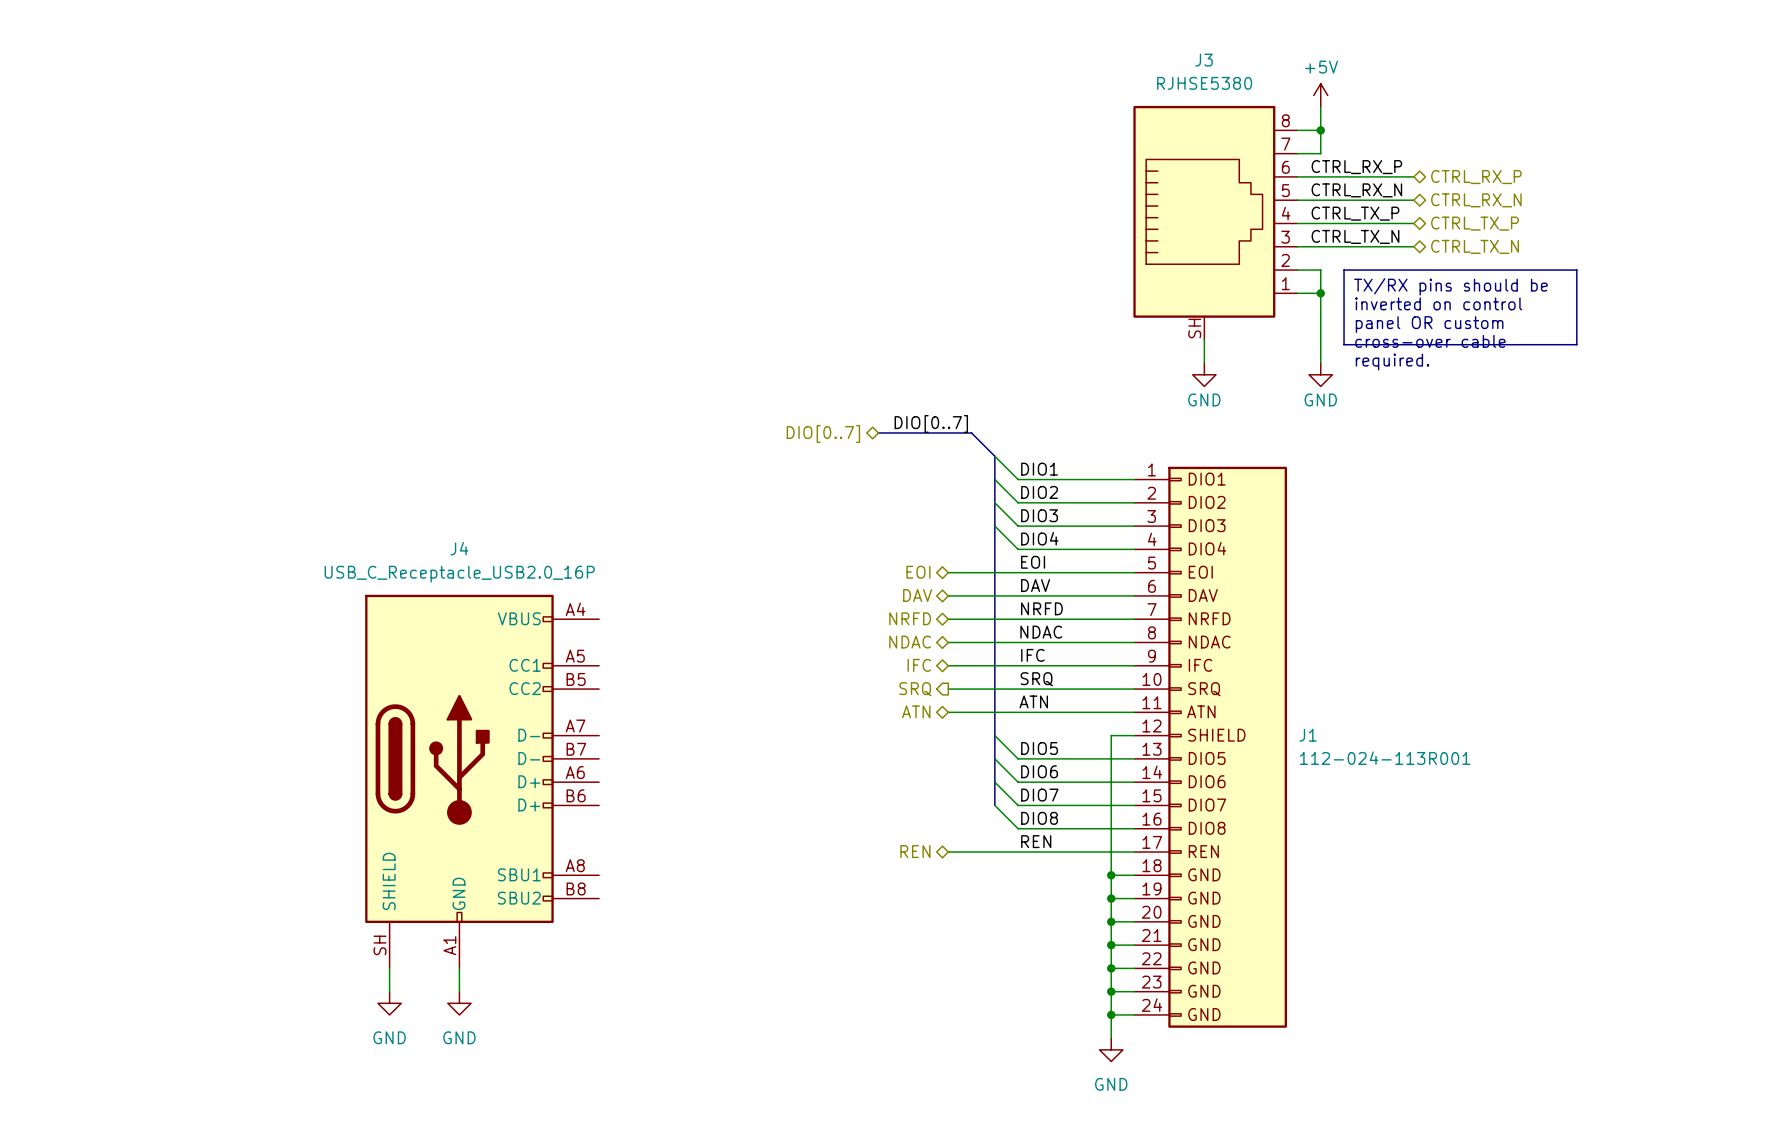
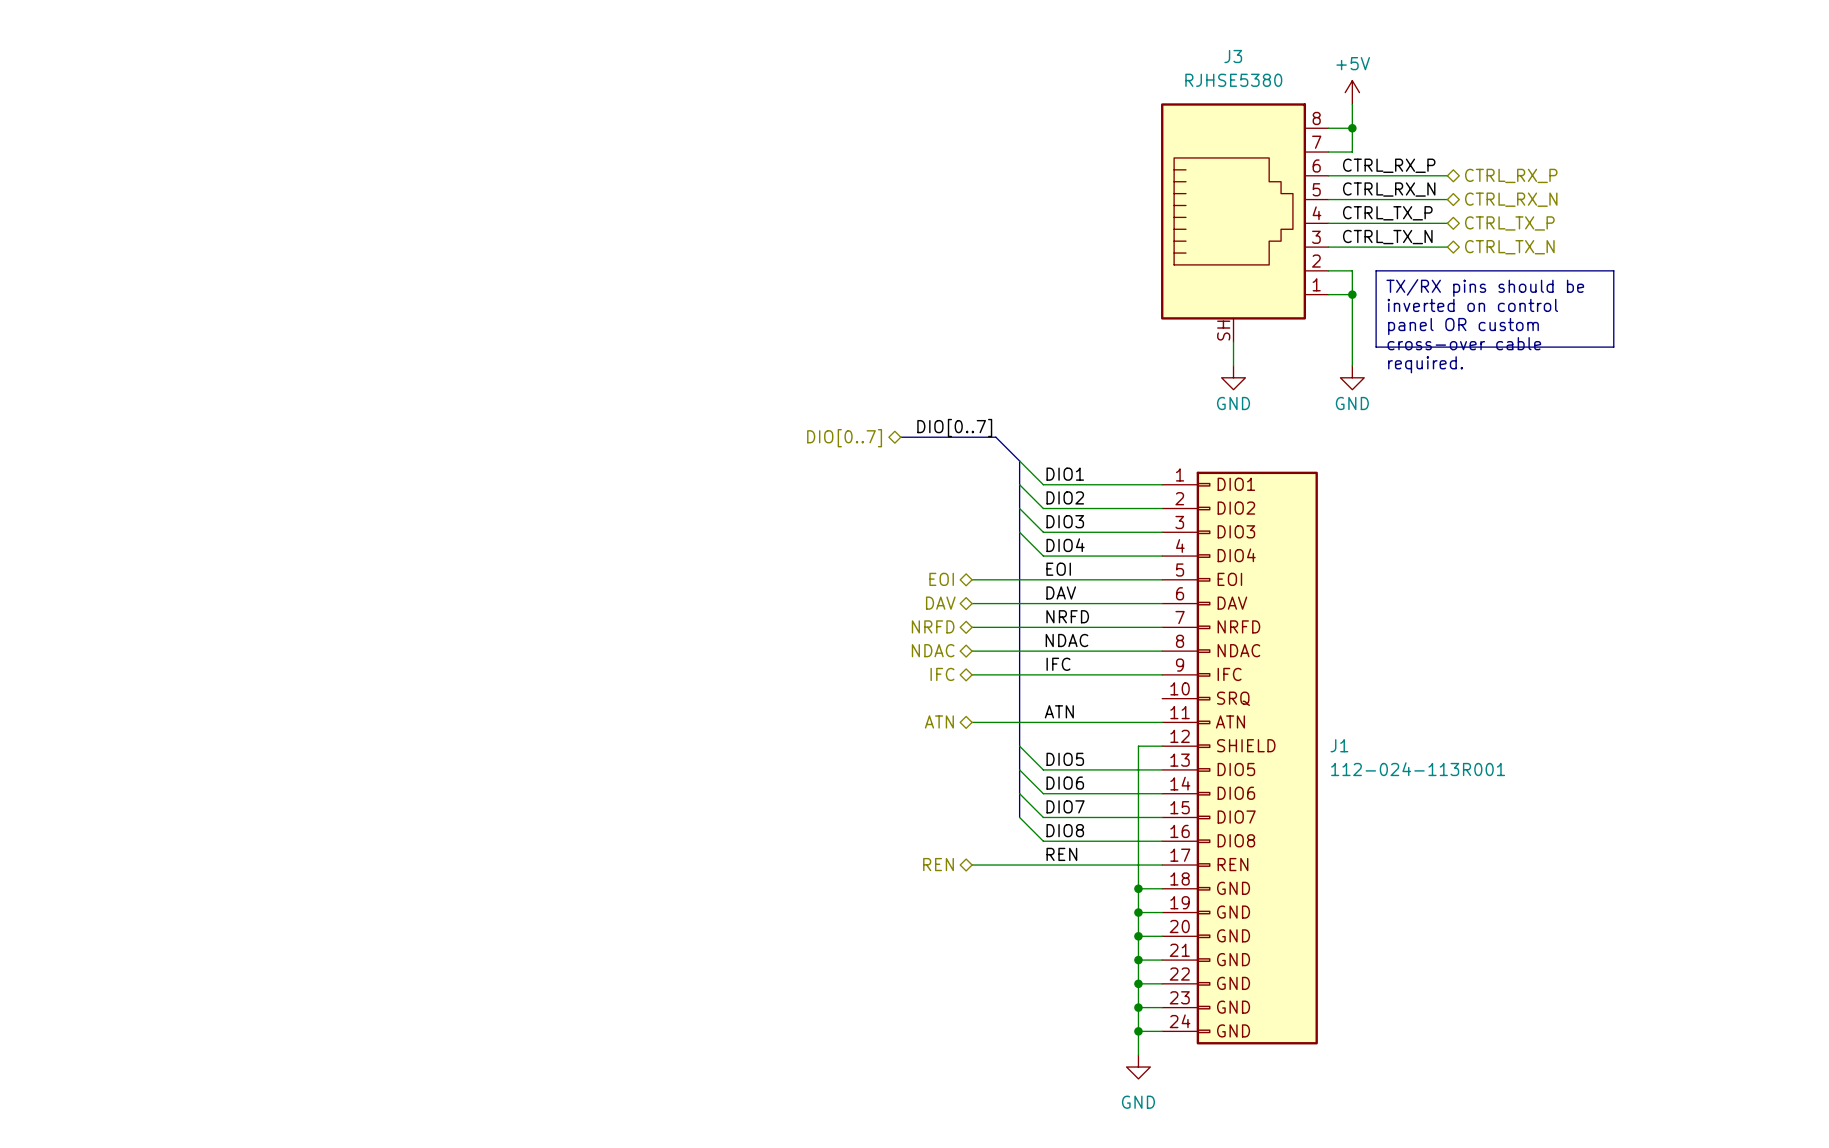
label: SRQ (1036, 679) -> none
hierarchical label: SRQ (915, 689) -> none
wire: (948, 689) (1134, 689) -> none
J4: USB_C_Receptacle_USB2.0_16P (482, 781) -> none
wire: (389, 968) (389, 991) -> none
wire: (459, 968) (459, 991) -> none
power symbol: GND (389, 1003) -> none
power symbol: GND (459, 1003) -> none

